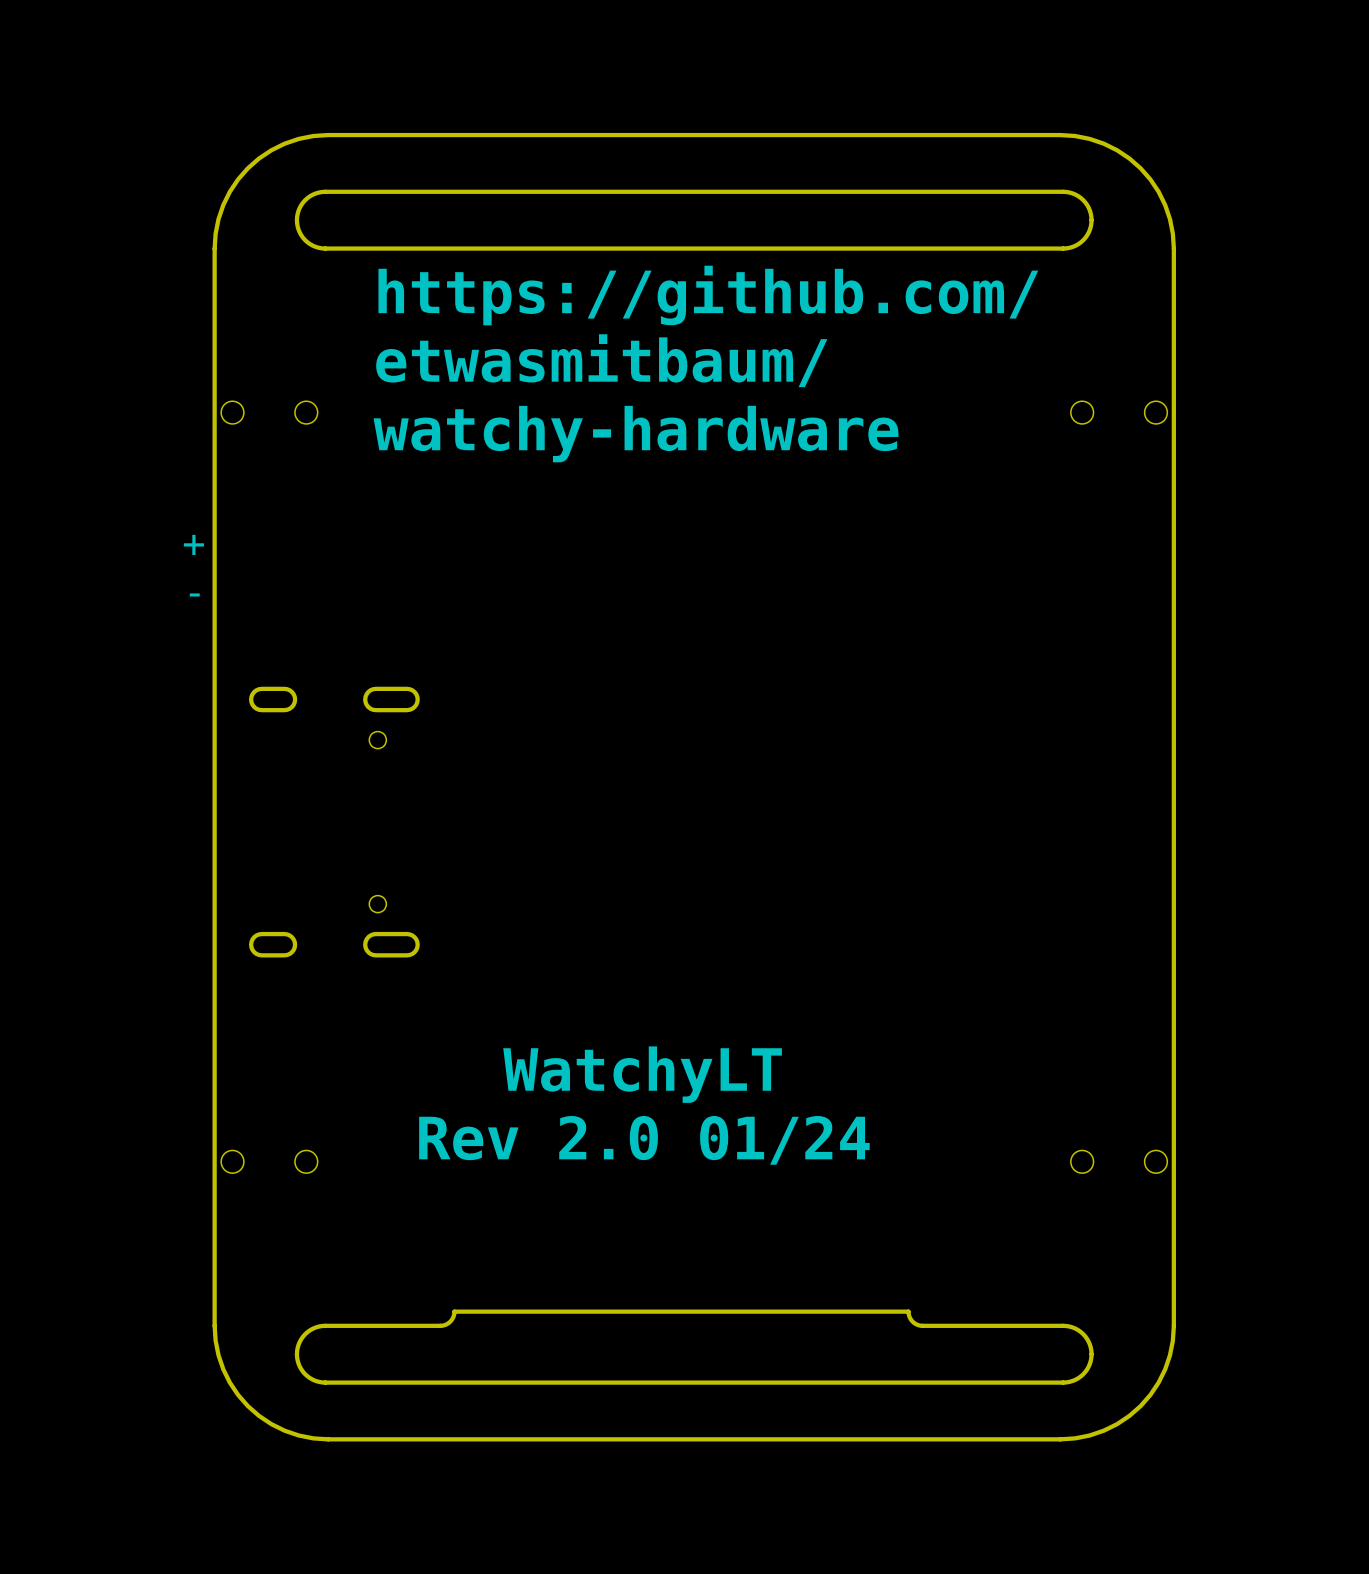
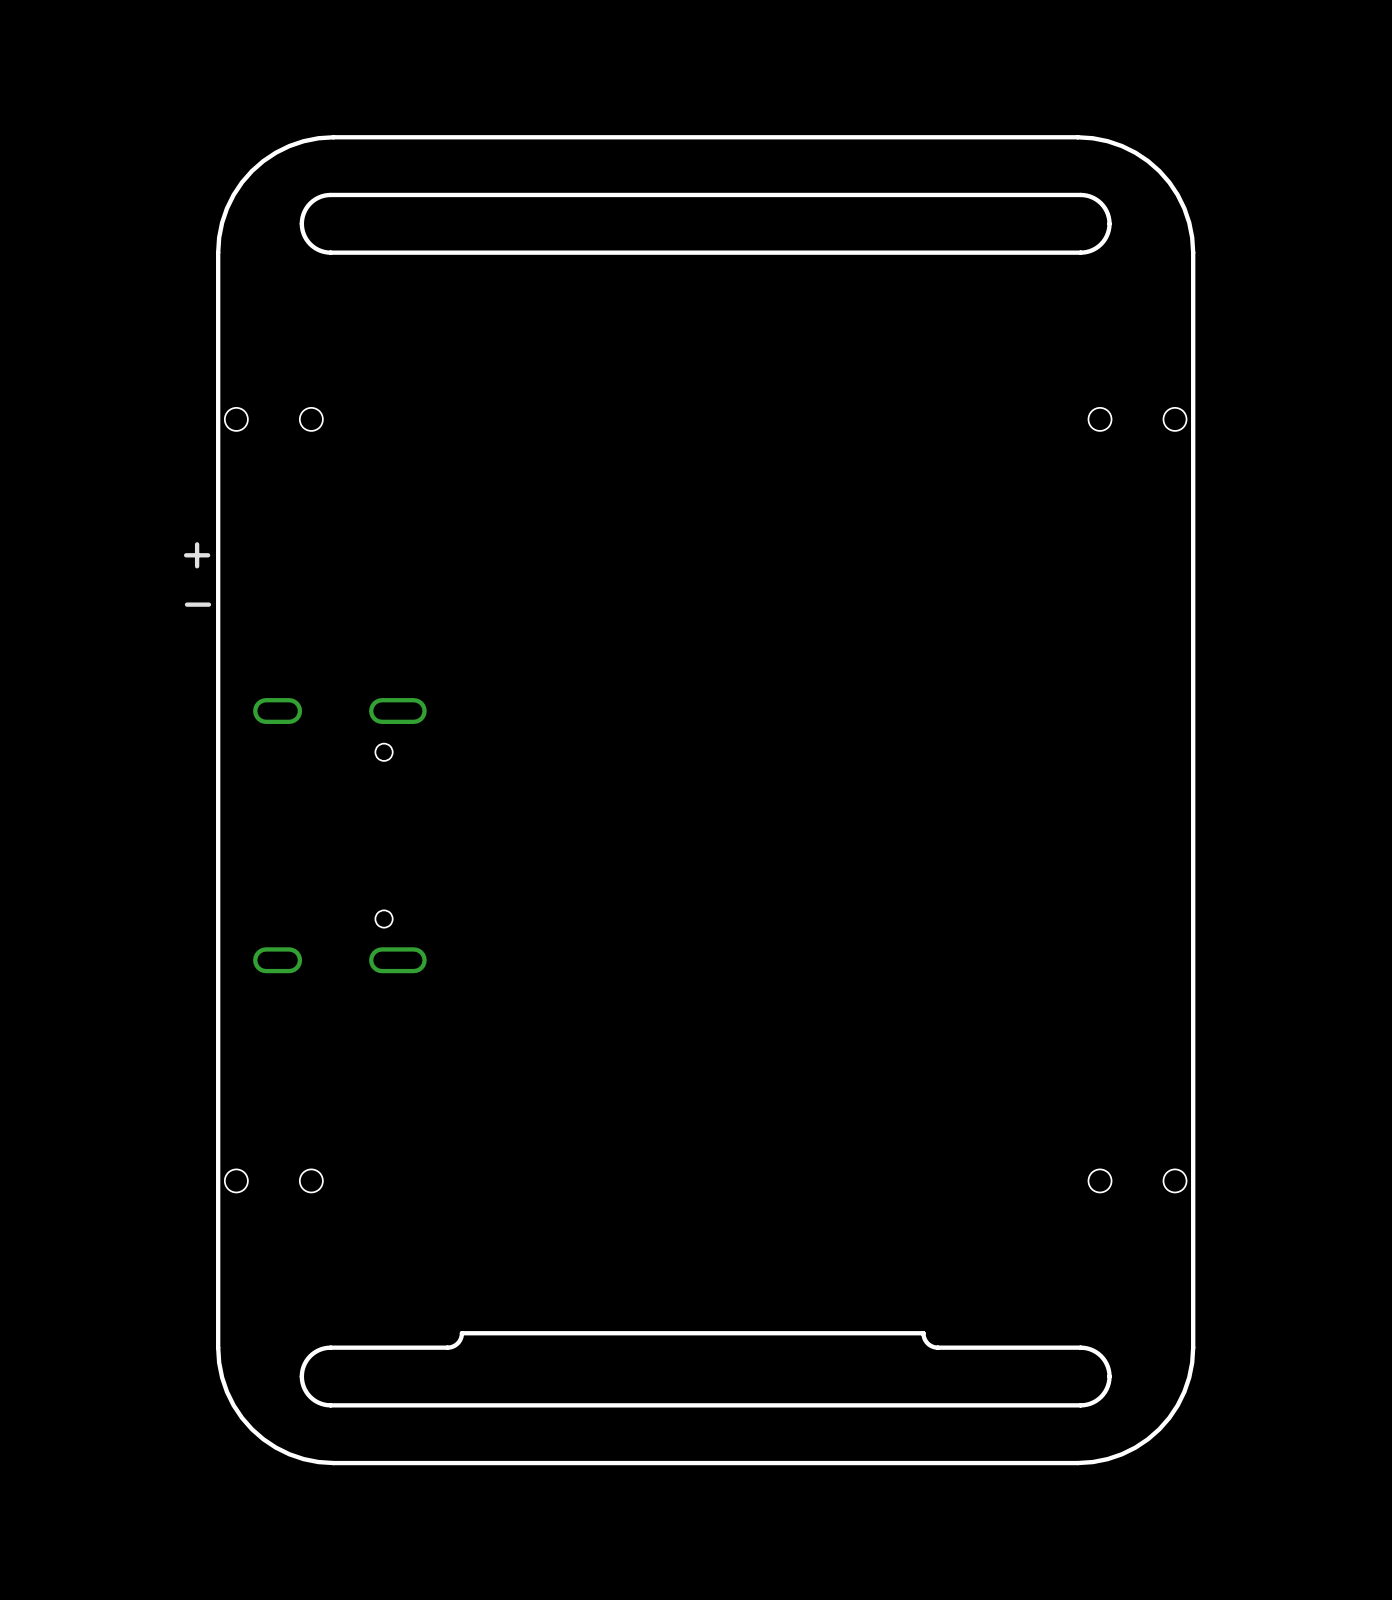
text: https://github.com/ (708, 295) -> none
text: etwasmitbaum/ (601, 360) -> none
text: watchy-hardware (636, 434) -> none
text: WatchyLT (642, 1074) -> none
text: Rev 2.0 01/24 (644, 1140) -> none

